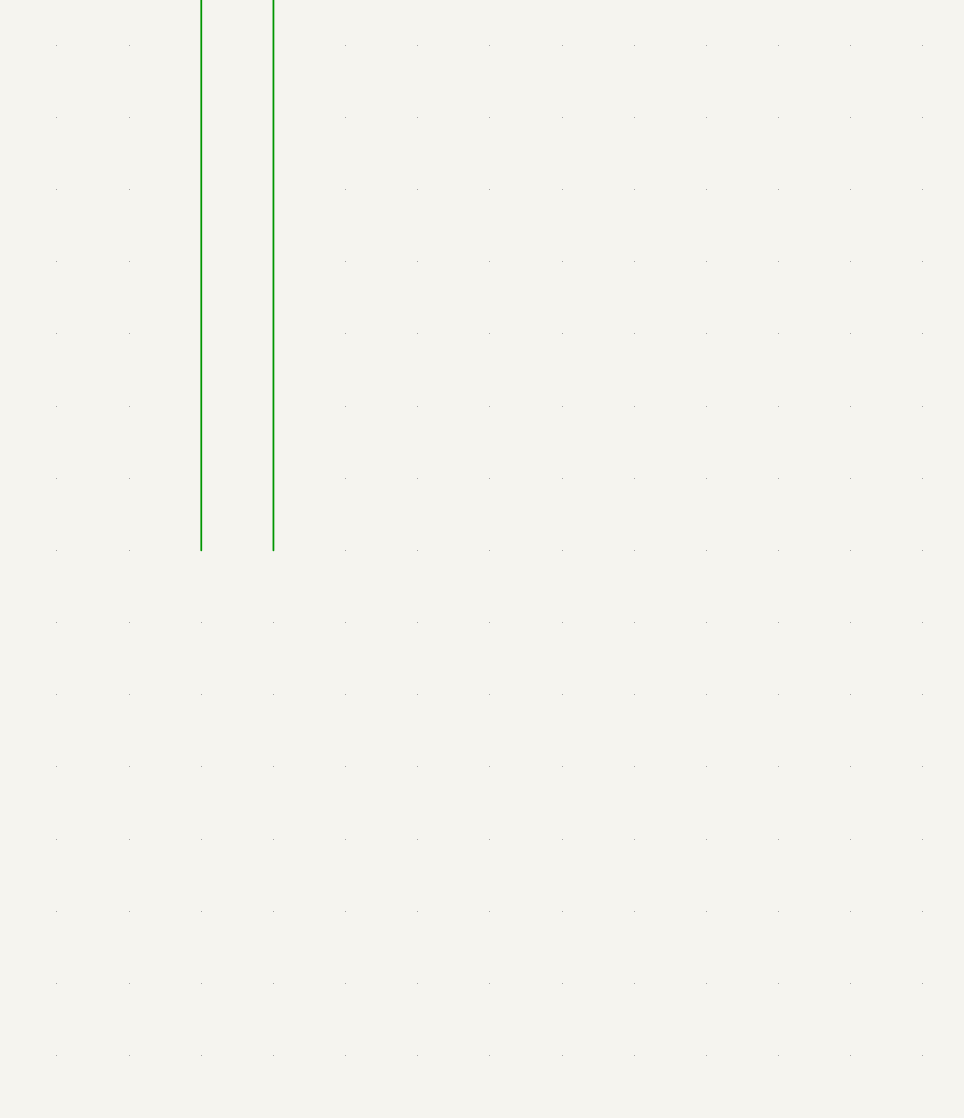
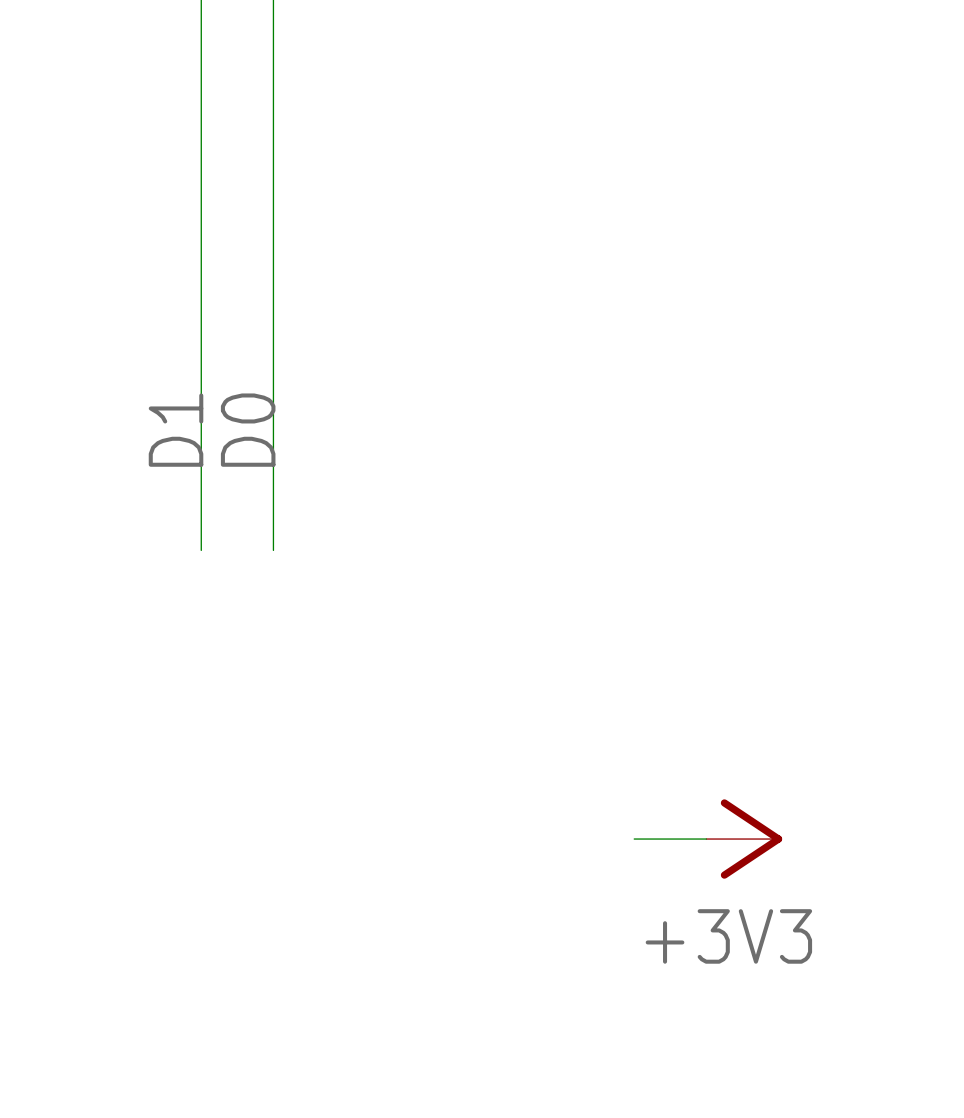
label: none -> D1 (176, 430)
label: none -> D0 (248, 430)
wire: none -> (634, 839) (706, 839)
power symbol: none -> +3V3 (744, 839)

